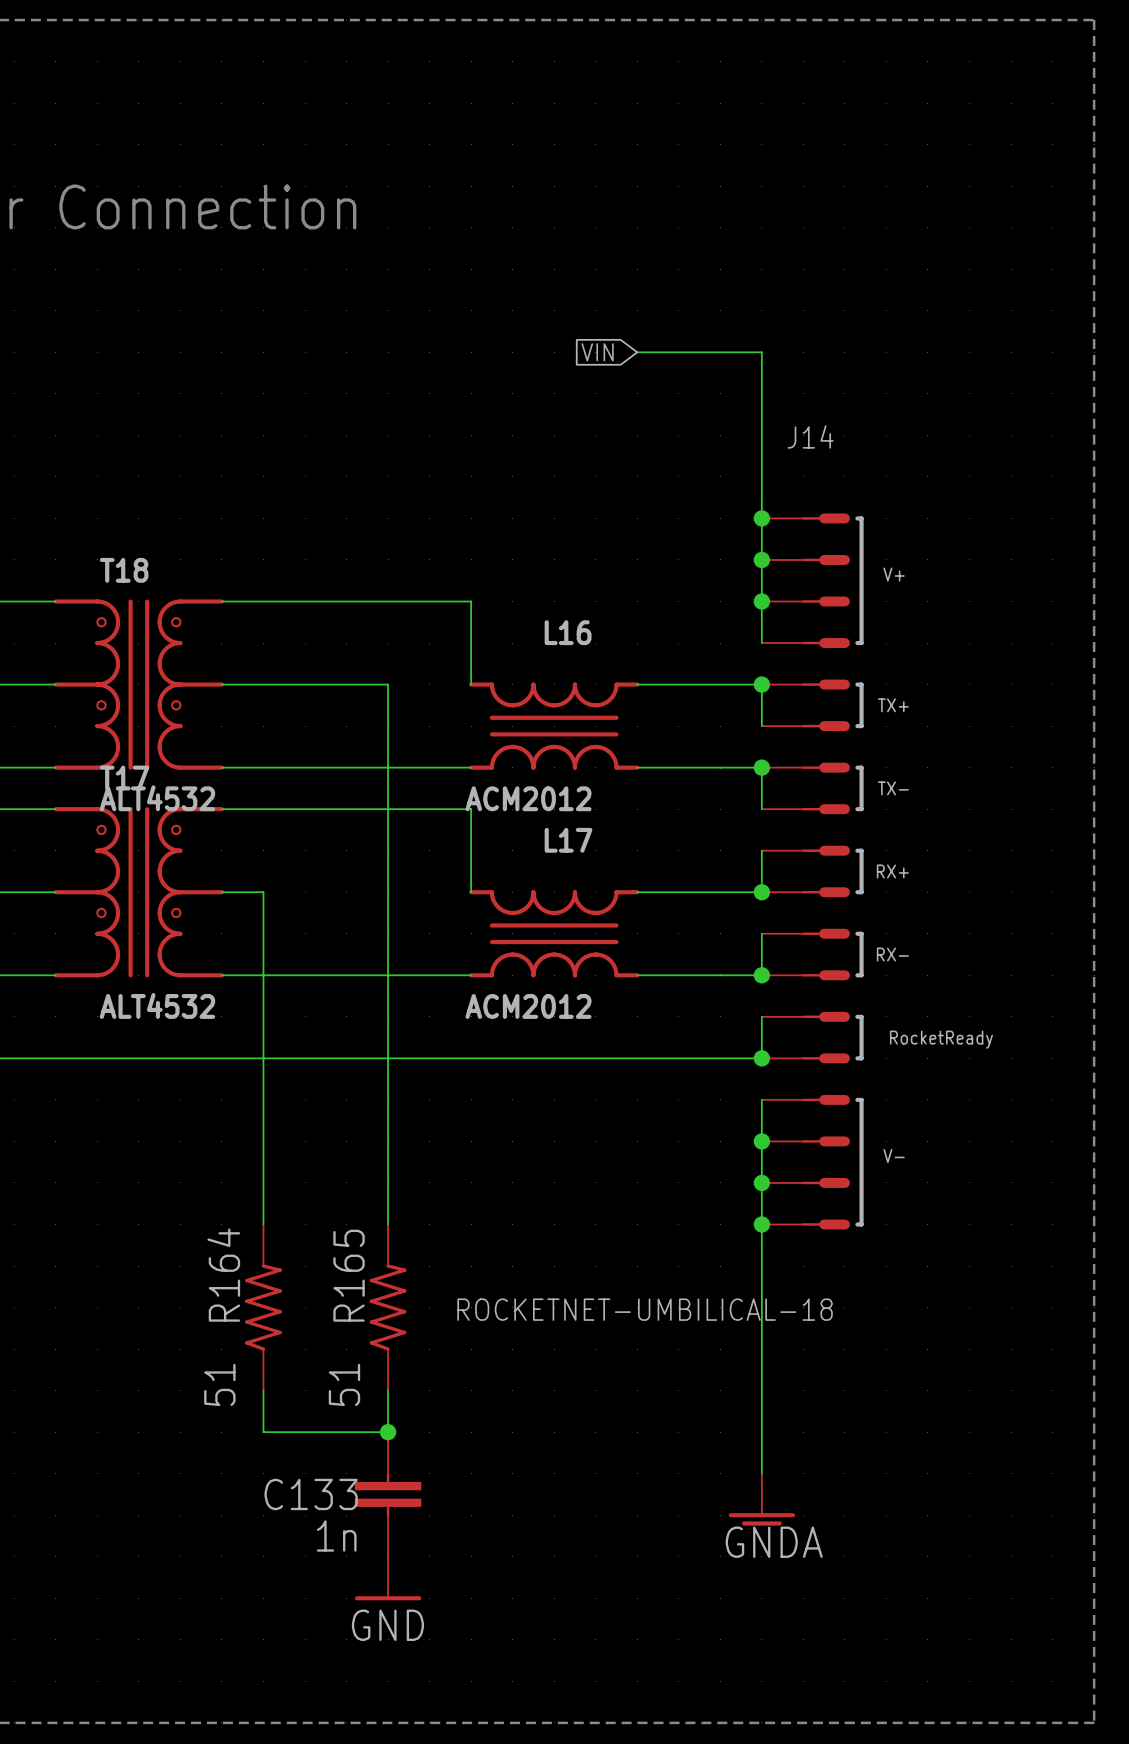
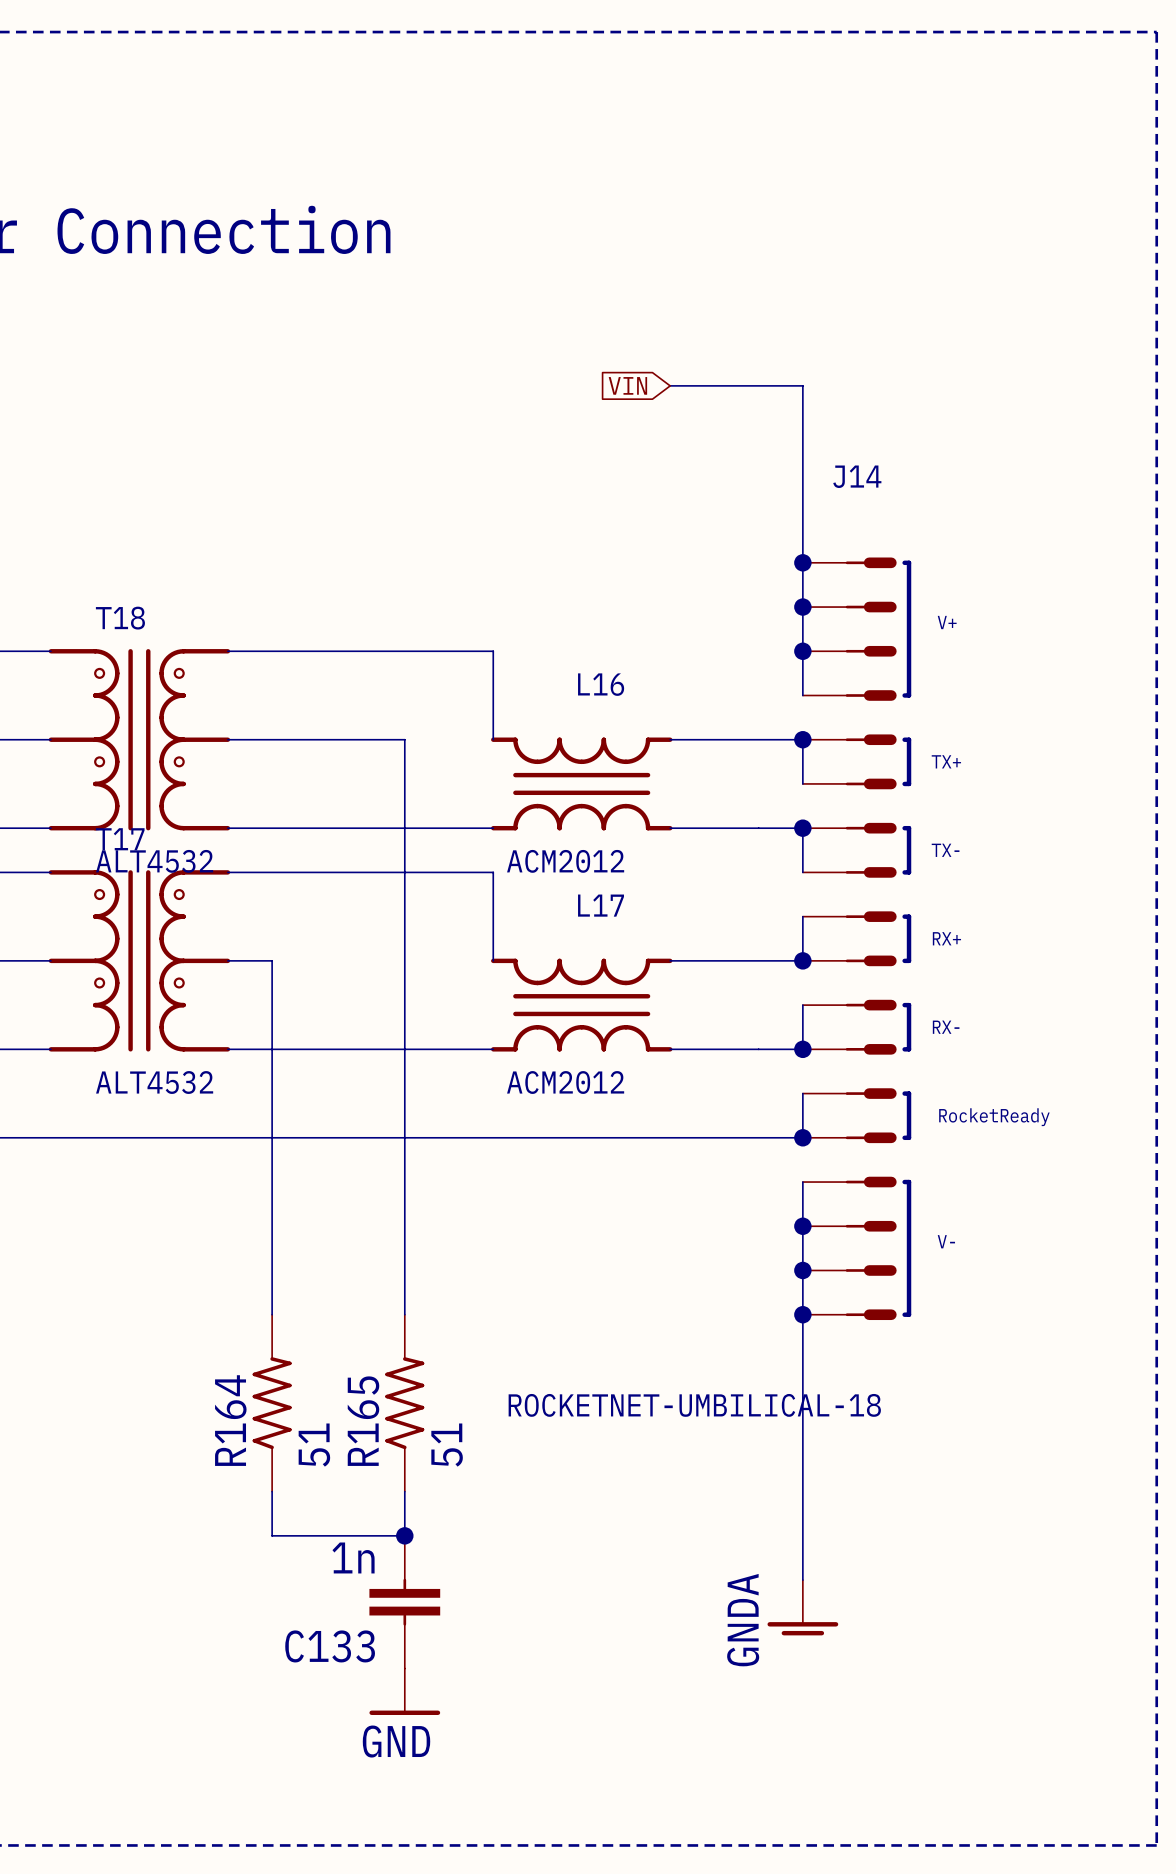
R164 name position: R164 (223, 1275) -> R164 (230, 1420)
R165 name position: R165 (349, 1275) -> R165 (363, 1421)
R164 value position: 51 (219, 1384) -> 51 (314, 1445)
R165 value position: 51 (344, 1384) -> 51 (447, 1445)
C133 name position: C133 (311, 1494) -> C133 (330, 1646)
C133 value position: 1n (336, 1535) -> 1n (353, 1557)
power symbol text rotation: 0° (774, 1542) -> 90° counterclockwise (743, 1620)

